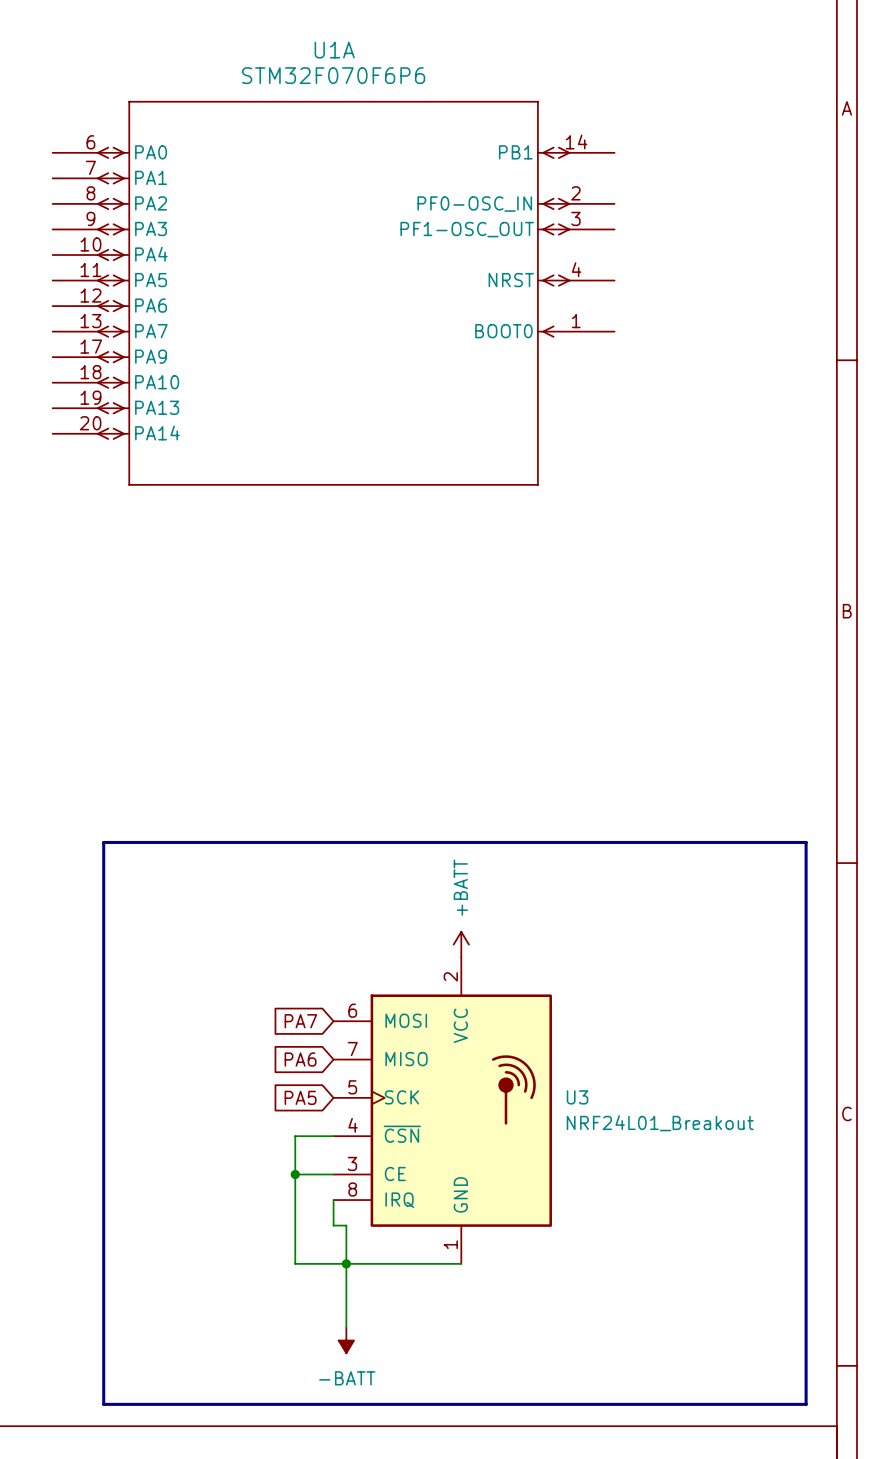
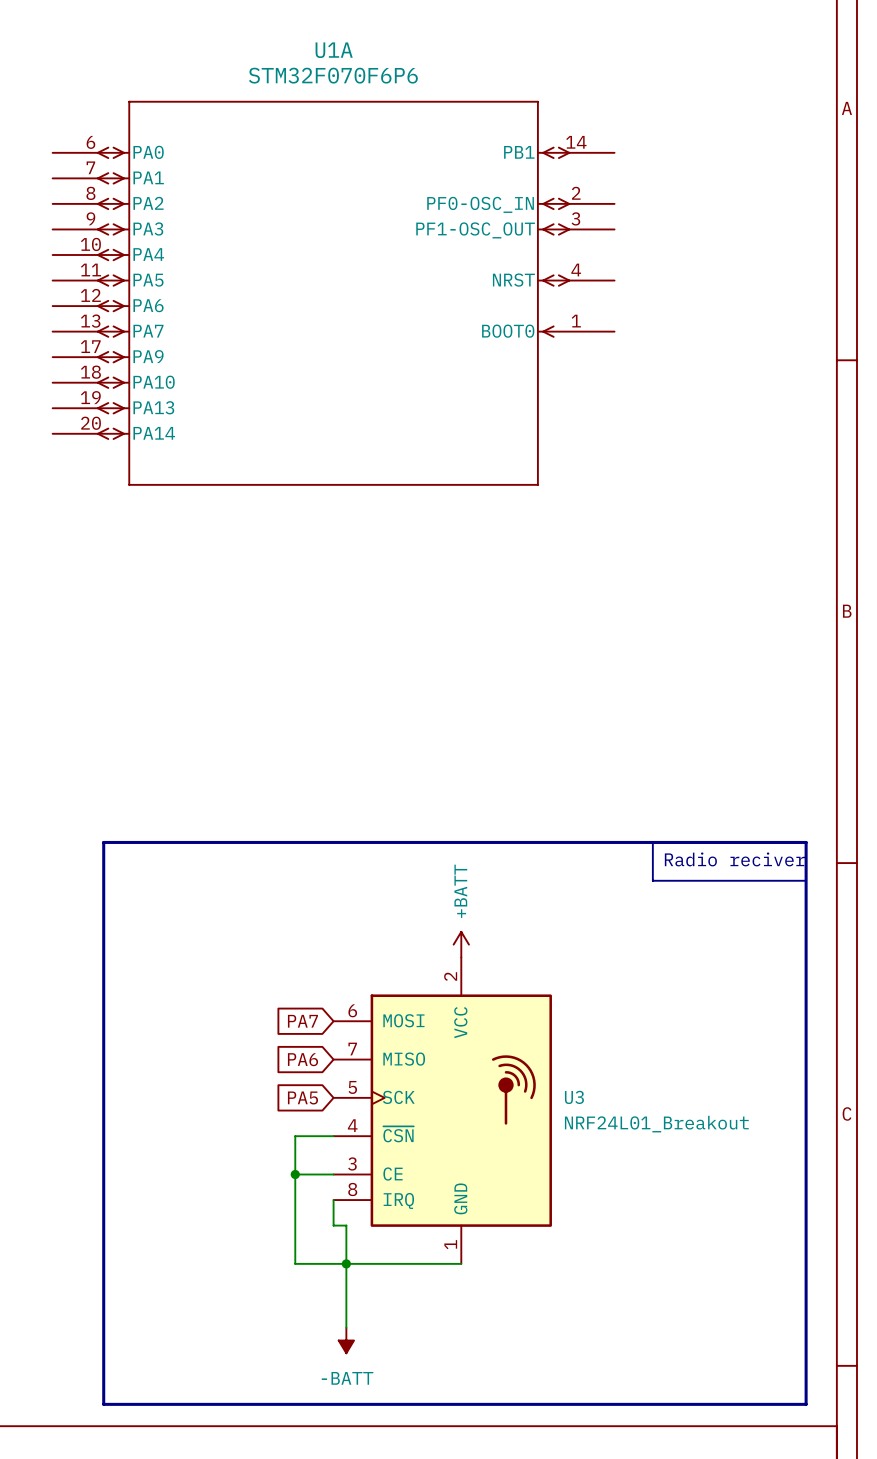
line: none -> (652, 842) (806, 842) (806, 880) (652, 880) (652, 842)
text: none -> Radio reciver (735, 859)

